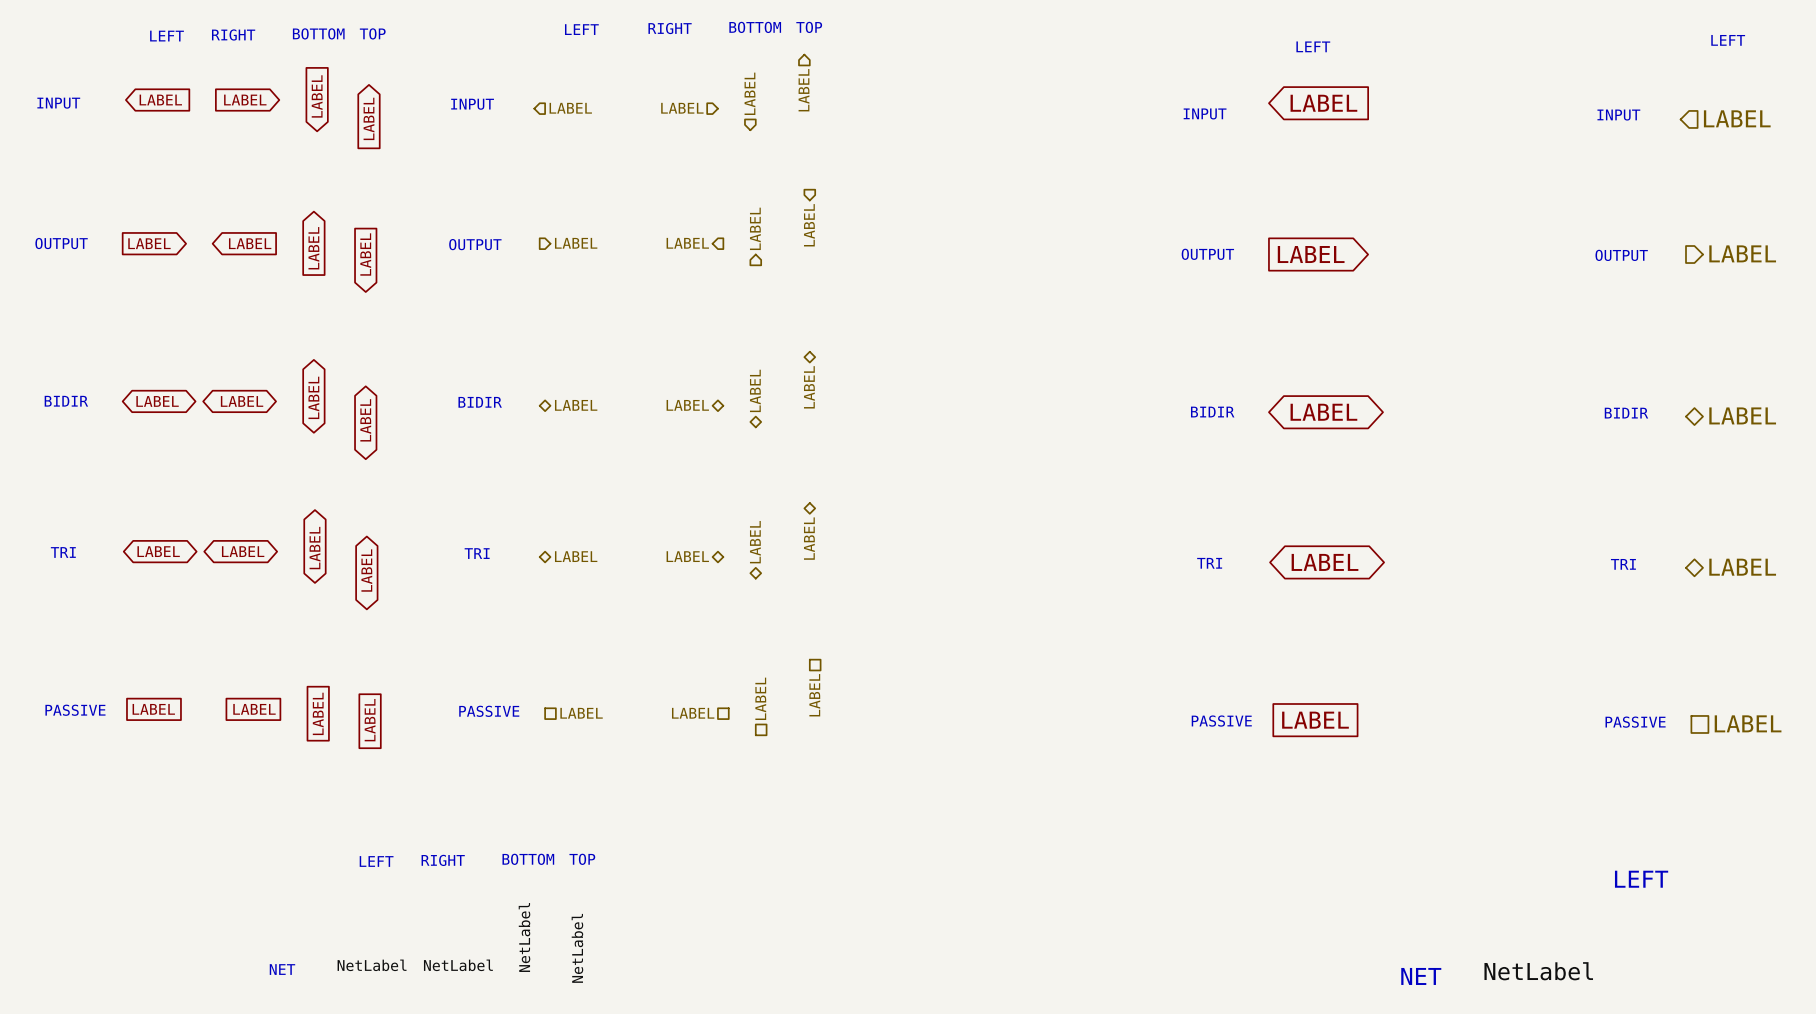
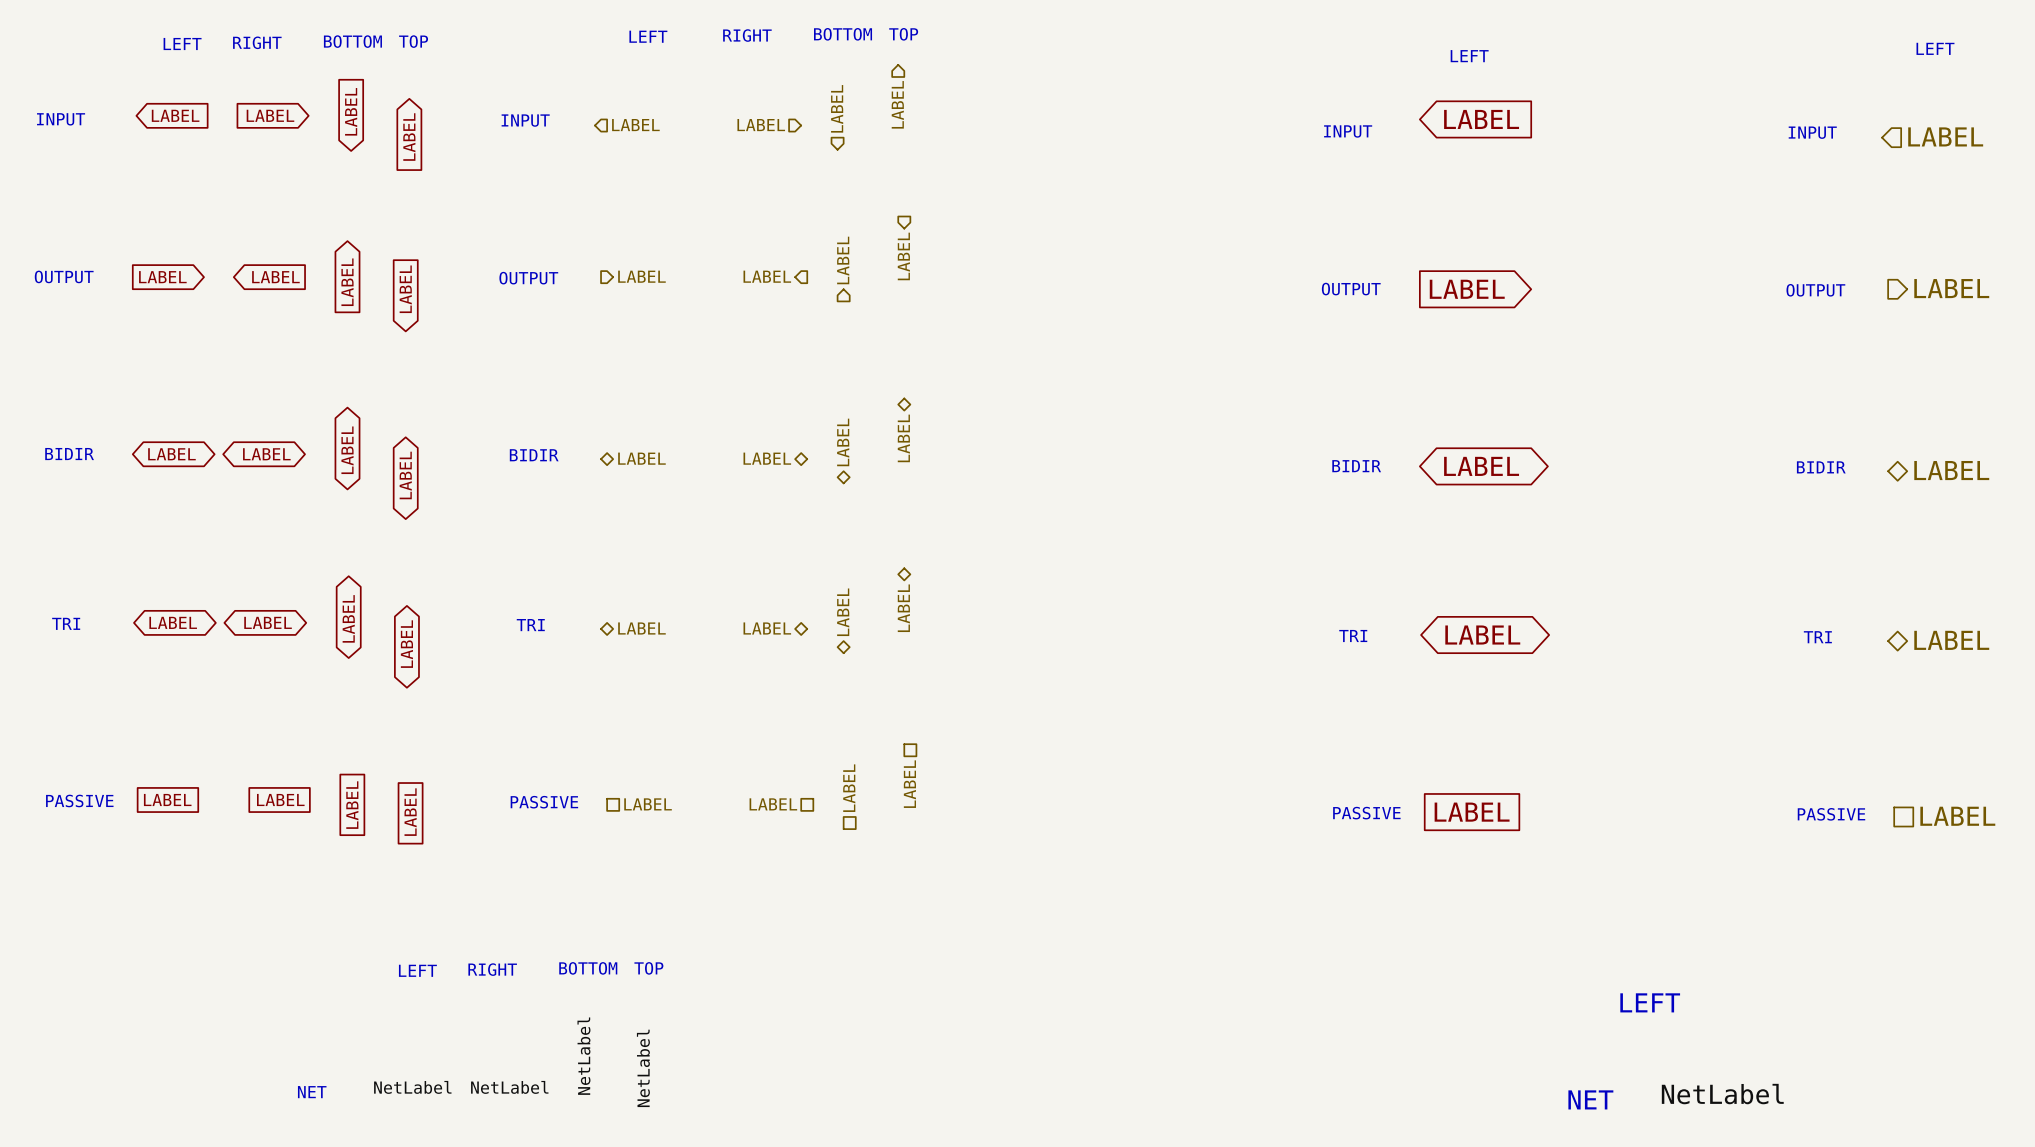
text position: LEFT (1641, 879) -> LEFT (1650, 1002)

